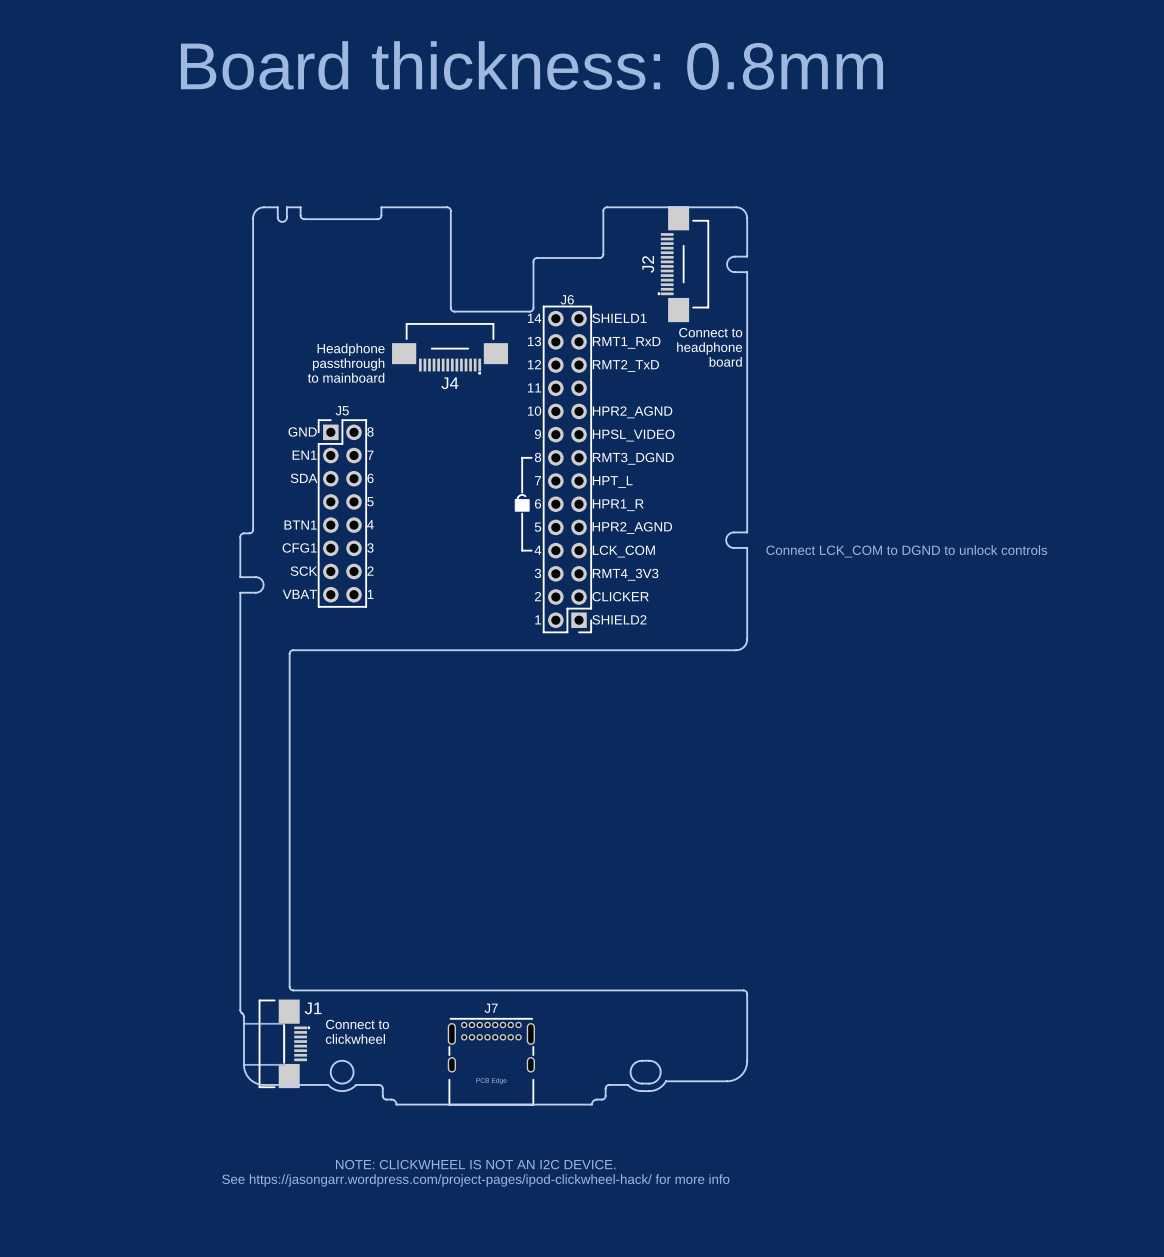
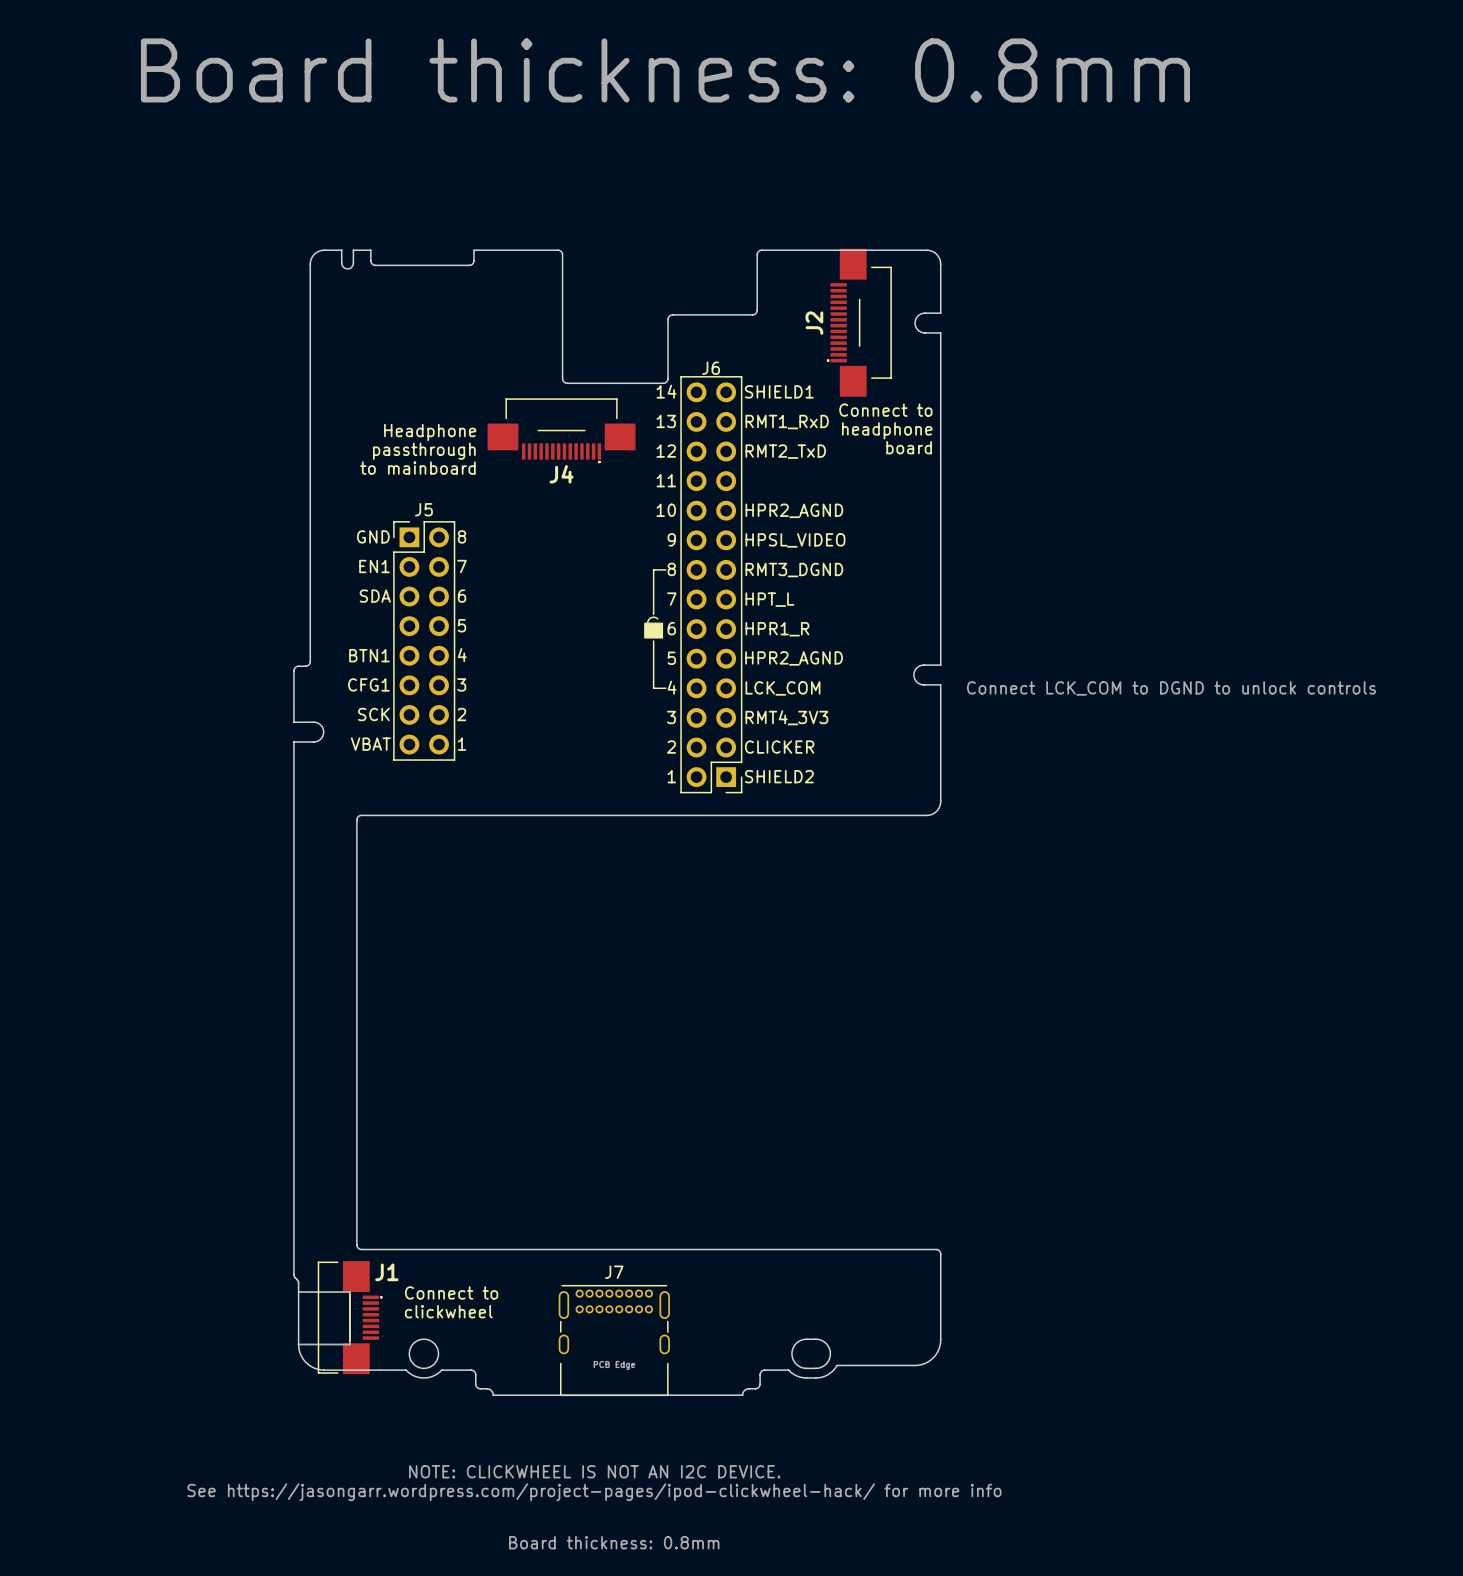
text: none -> Board thickness: 0.8mm (614, 1542)

